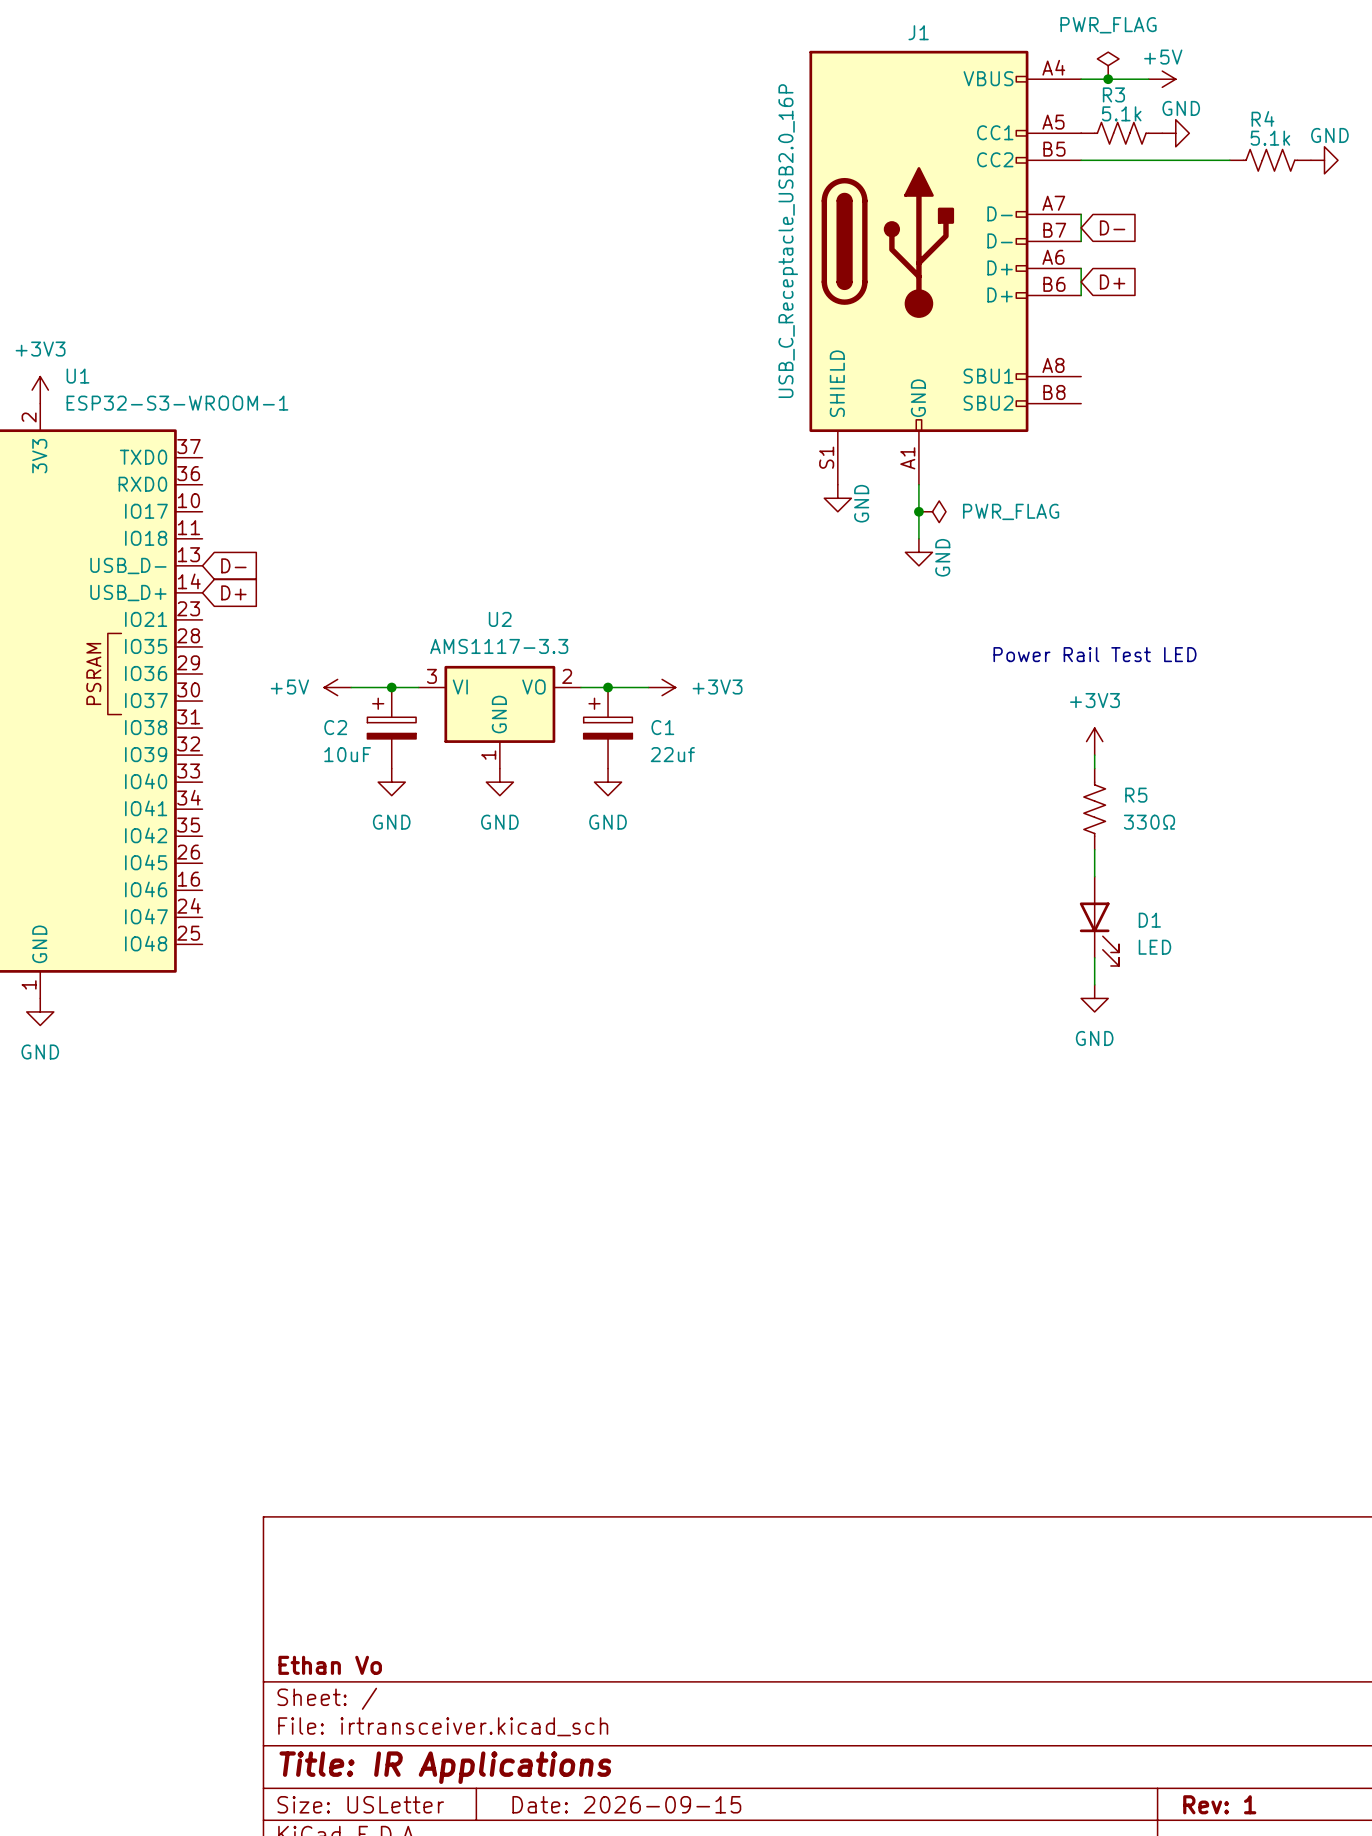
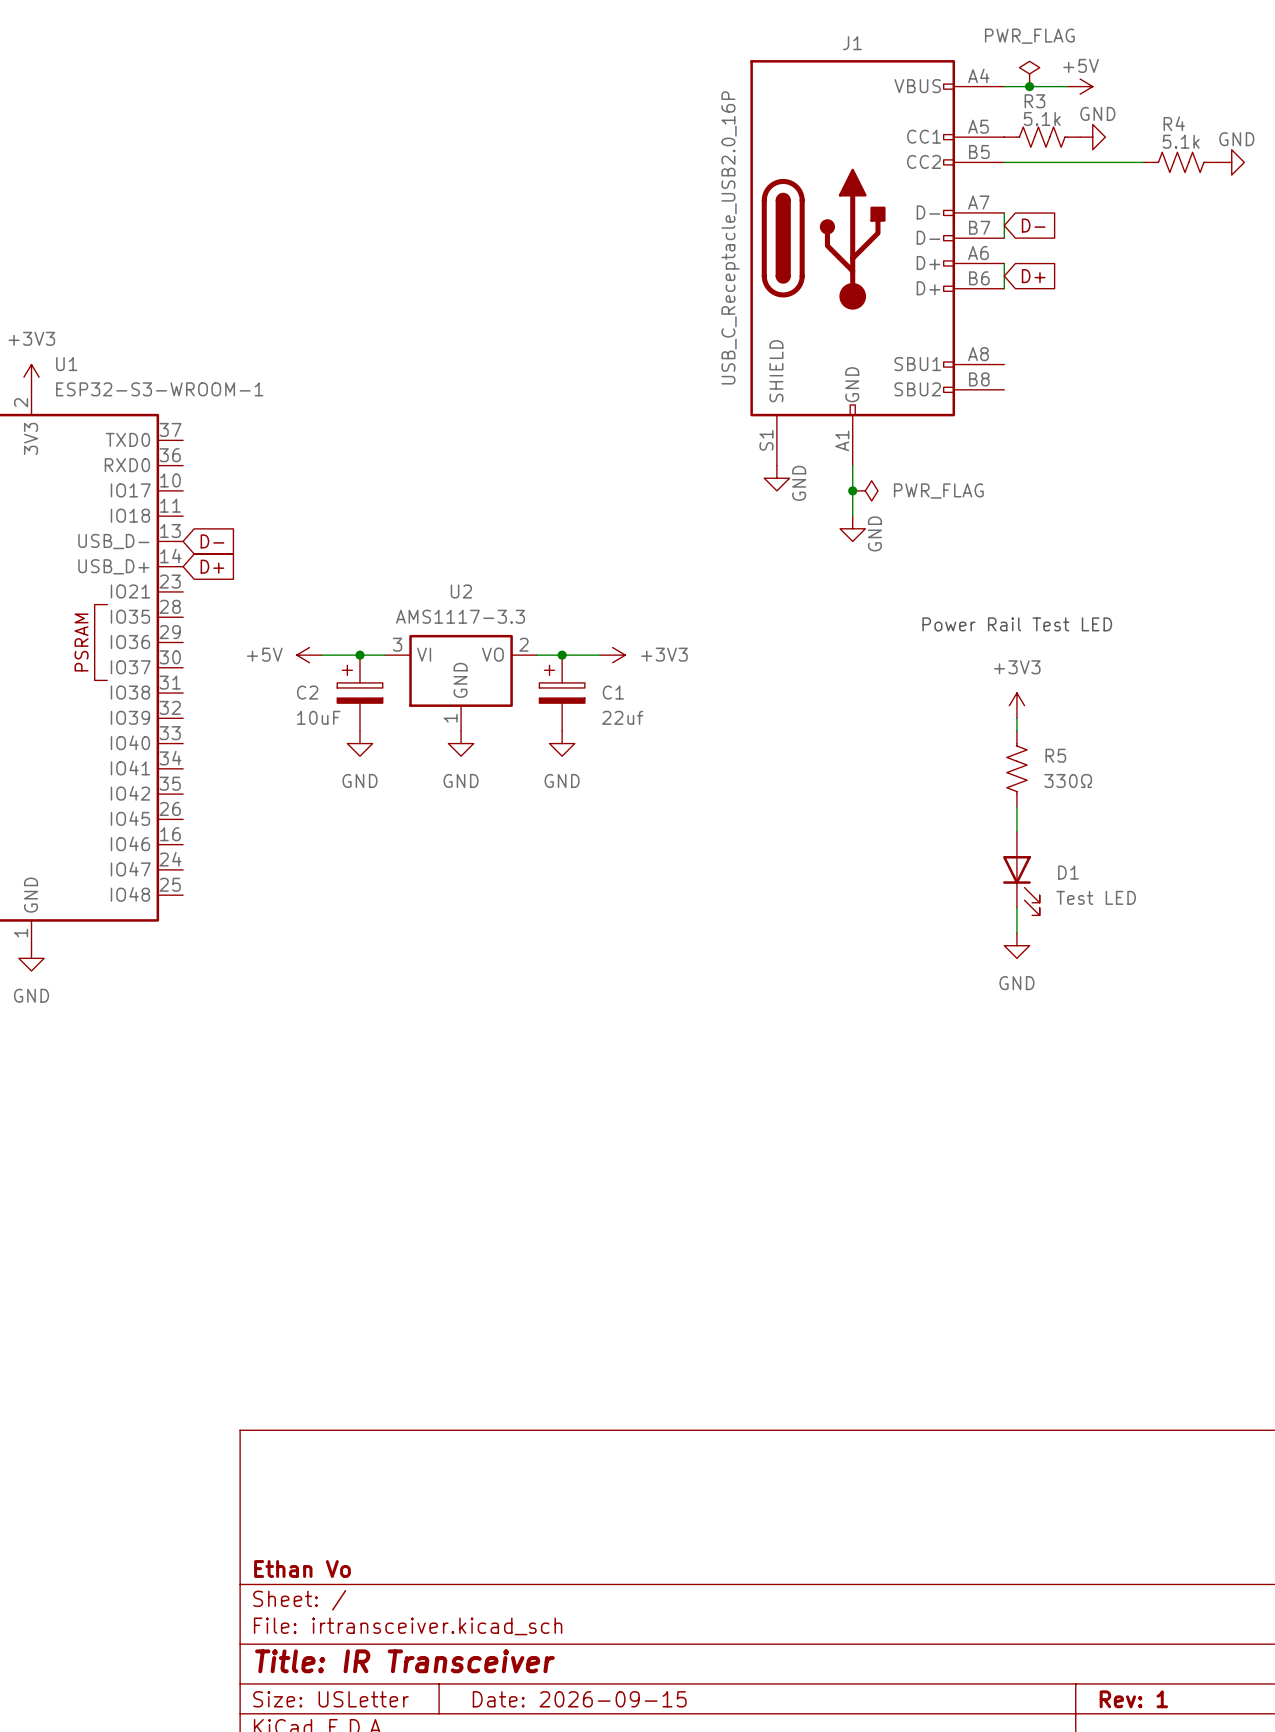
D1 value: LED (1154, 947) -> Test LED (1096, 897)
title block: Title: IR Applications (445, 1767) -> Title: IR Transceiver (404, 1661)

